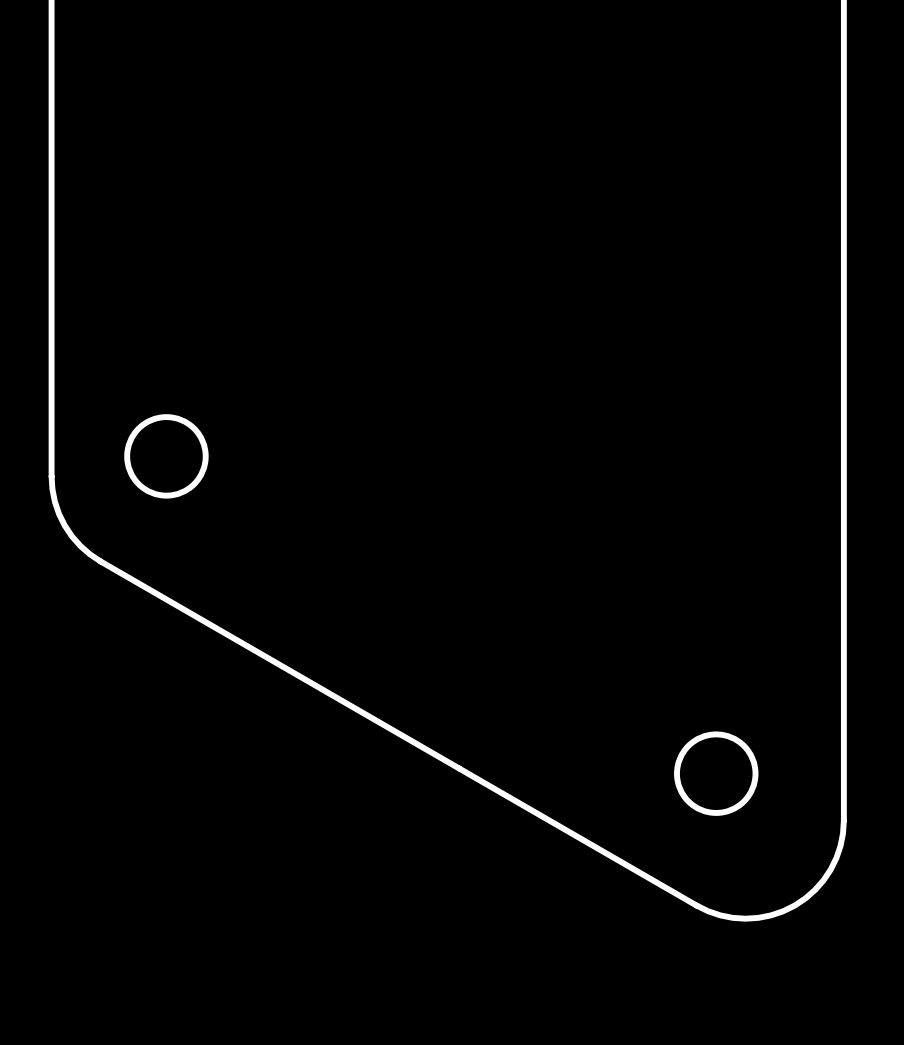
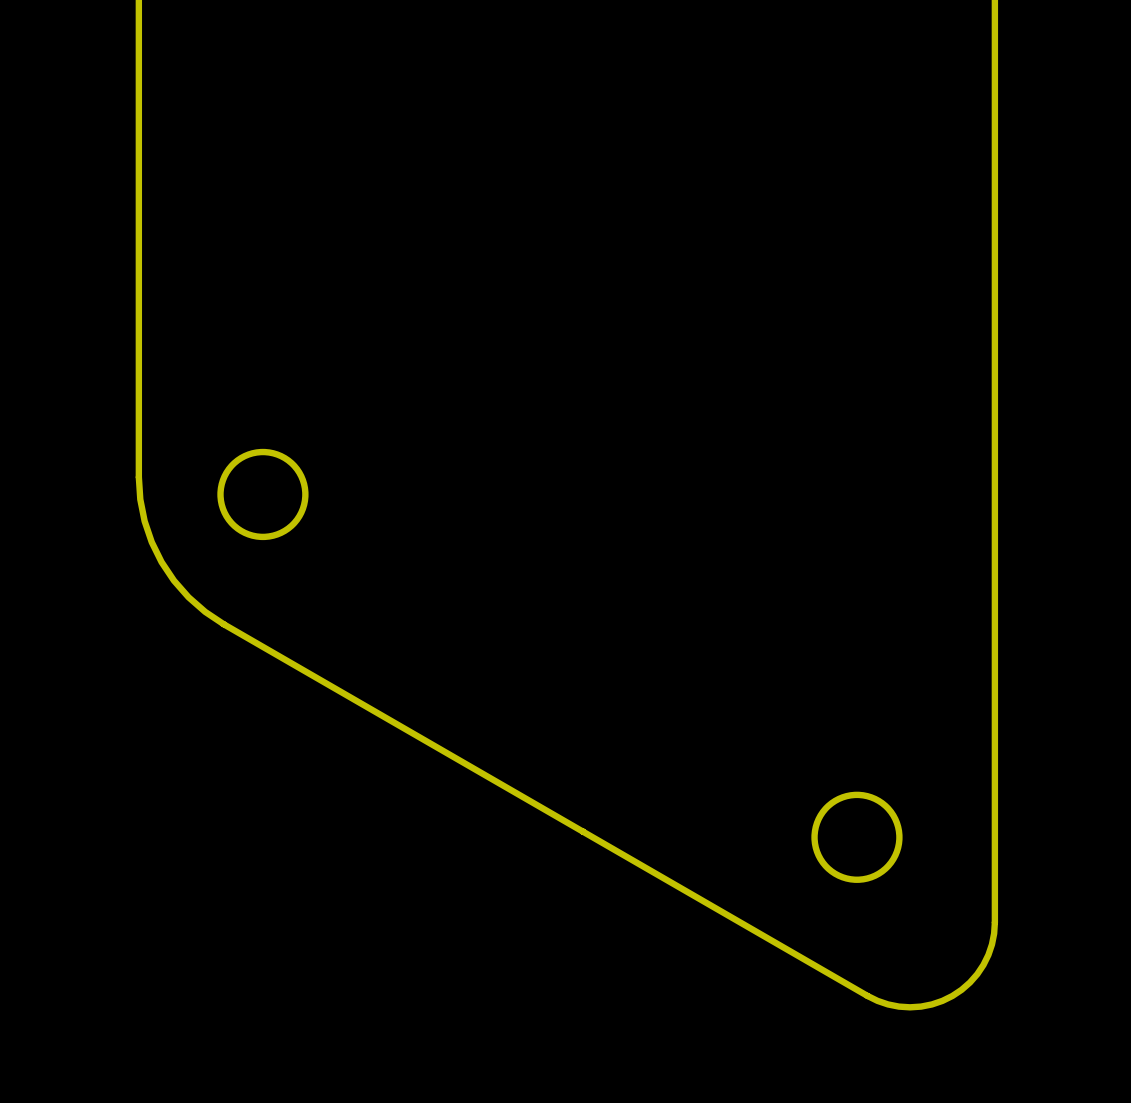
board edge: (51, 440) (51, 476) (54, 501) (64, 525) (80, 545) (90, 554) (708, 911) (720, 915) (745, 918) (771, 915) (794, 905) (815, 889) (830, 869) (840, 845) (843, 820) -> (138, 477) (144, 521) (161, 562) (188, 597) (205, 611) (877, 1000) (898, 1006) (921, 1006) (942, 1000) (970, 982) (983, 964) (991, 944) (994, 922) (994, 887)

